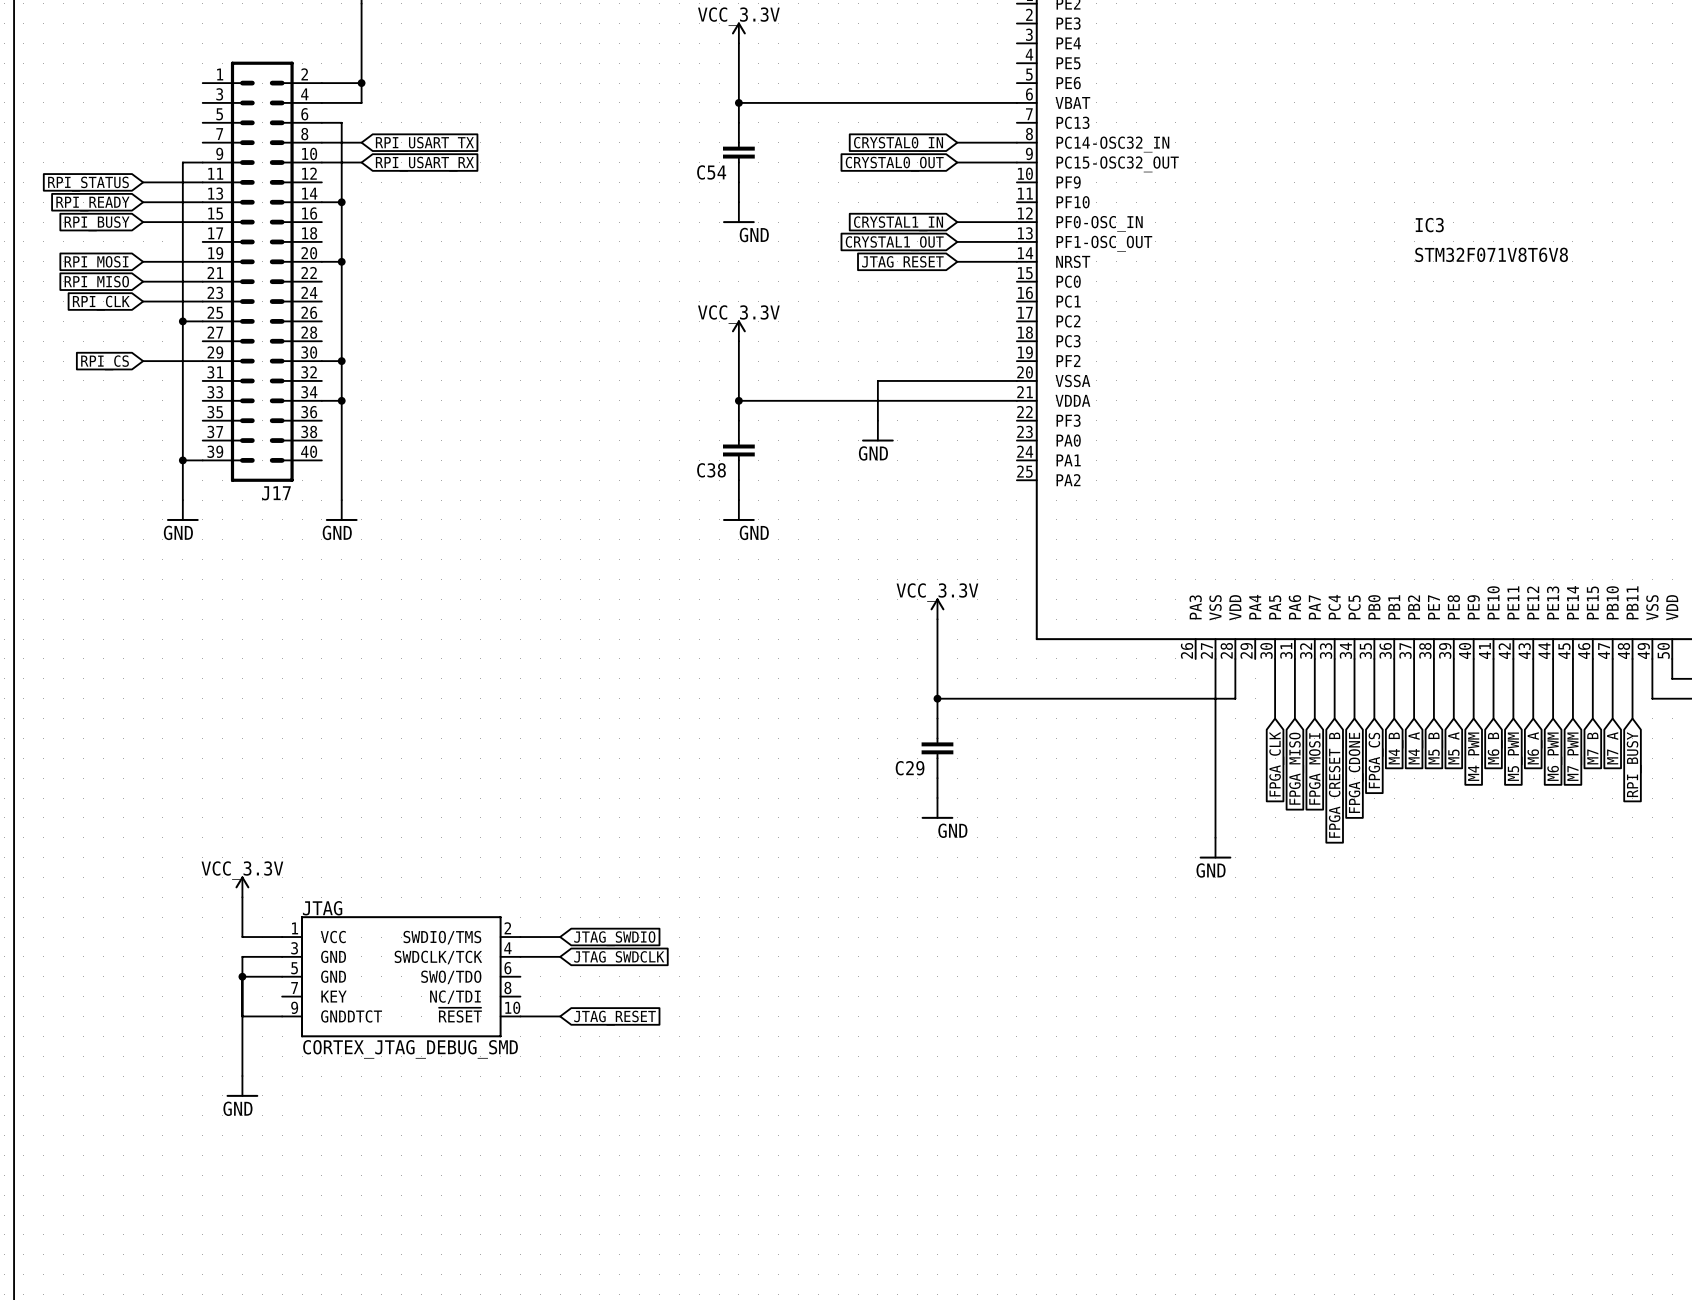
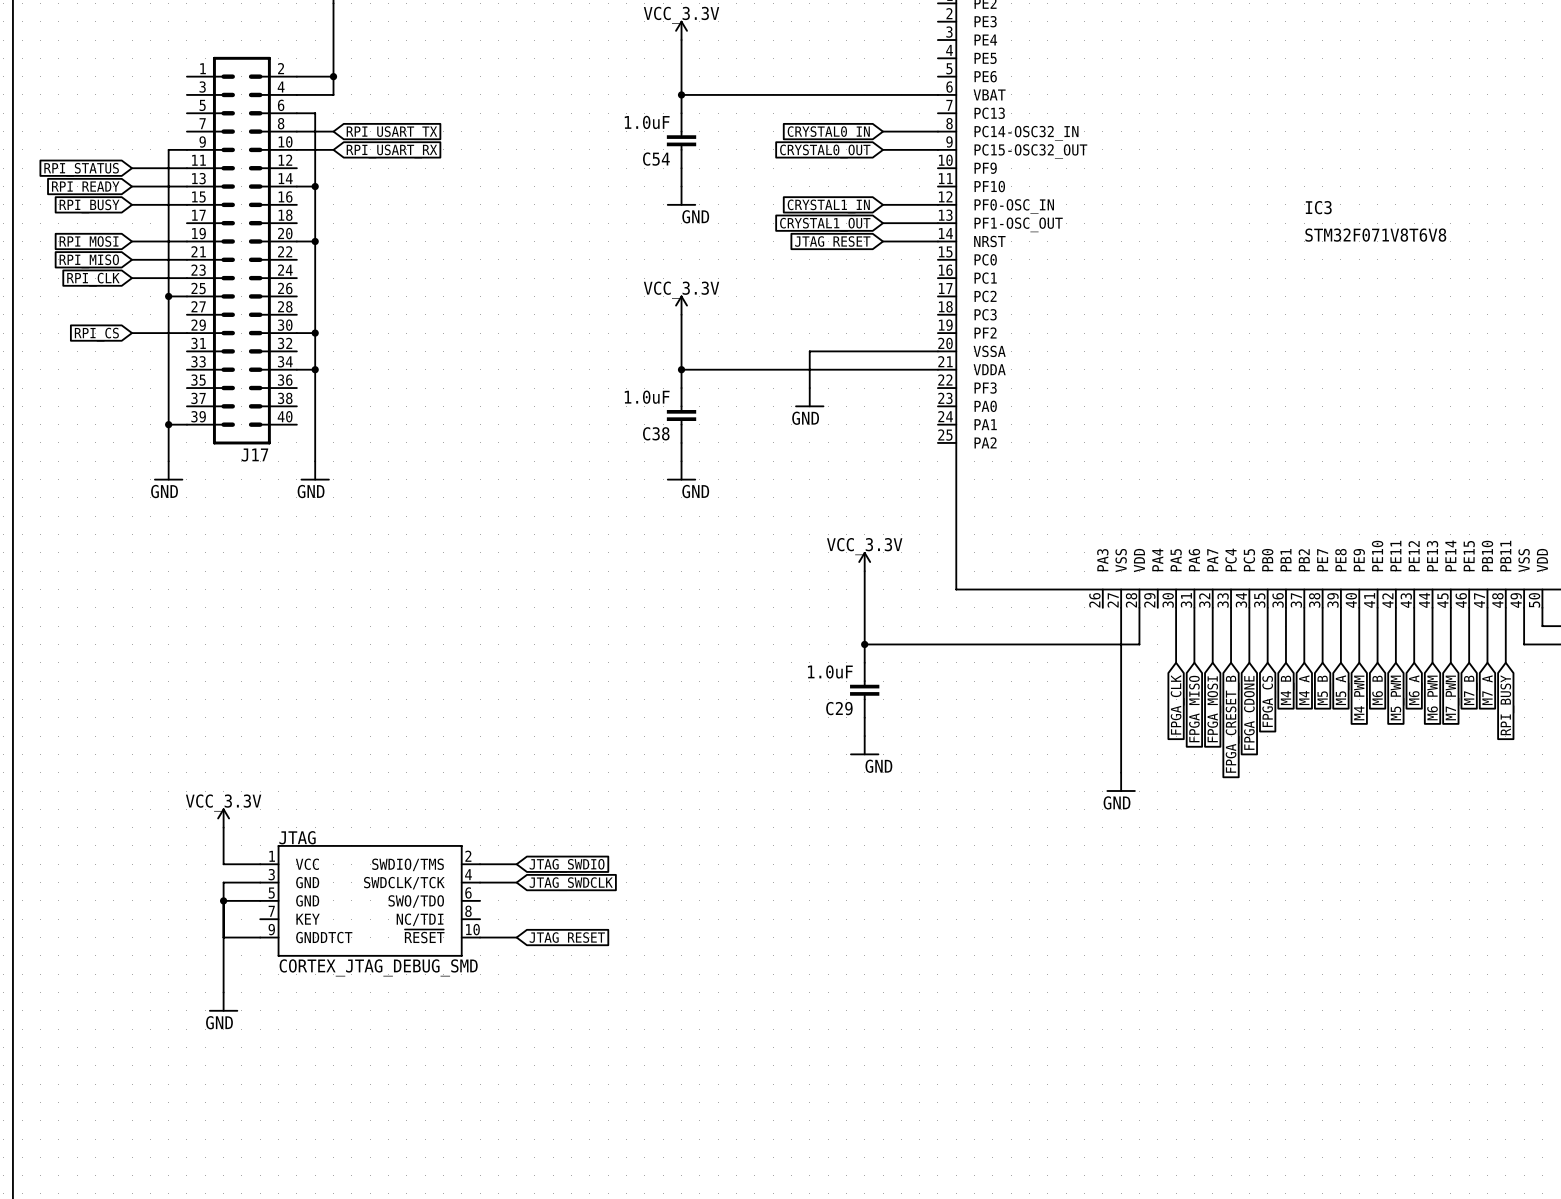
C54 value: none -> 1.0uF (647, 122)
C38 value: none -> 1.0uF (647, 397)
C29 value: none -> 1.0uF (830, 671)

